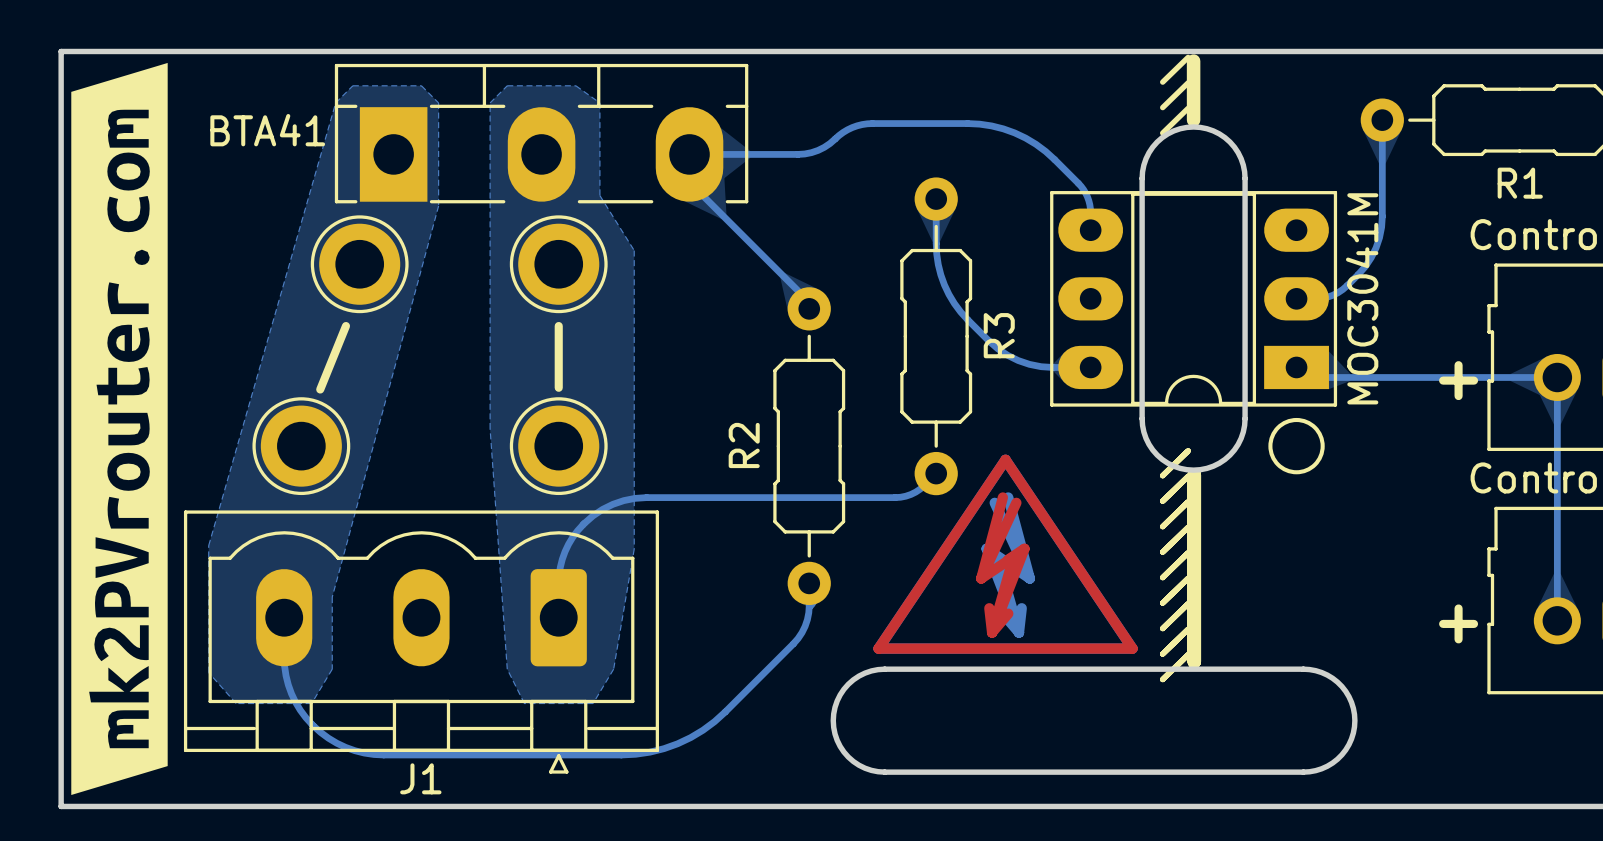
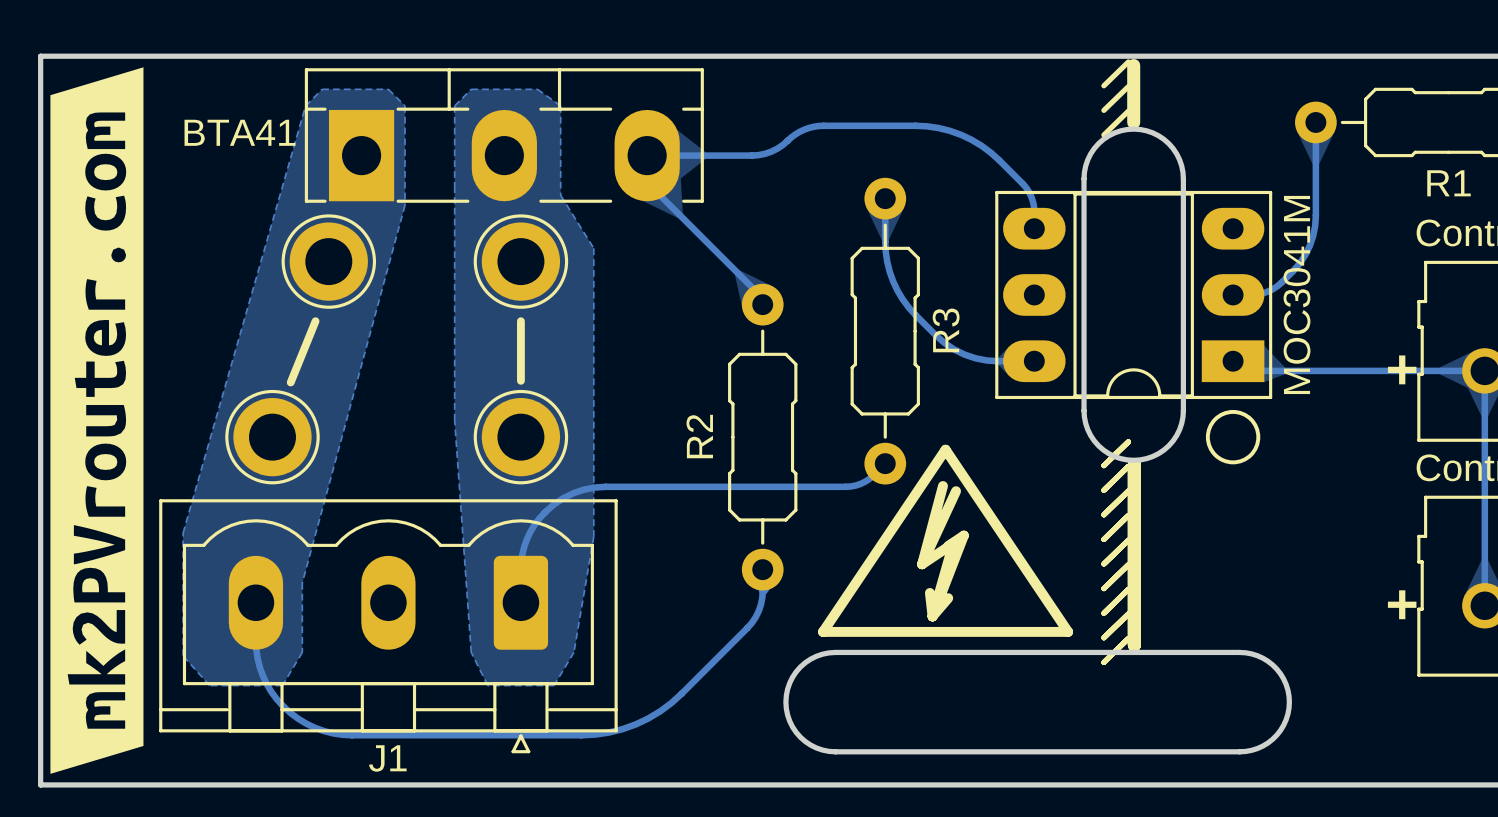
drawing: none -> [818, 444, 1074, 637]
drawing: [873, 454, 1138, 654] -> none

